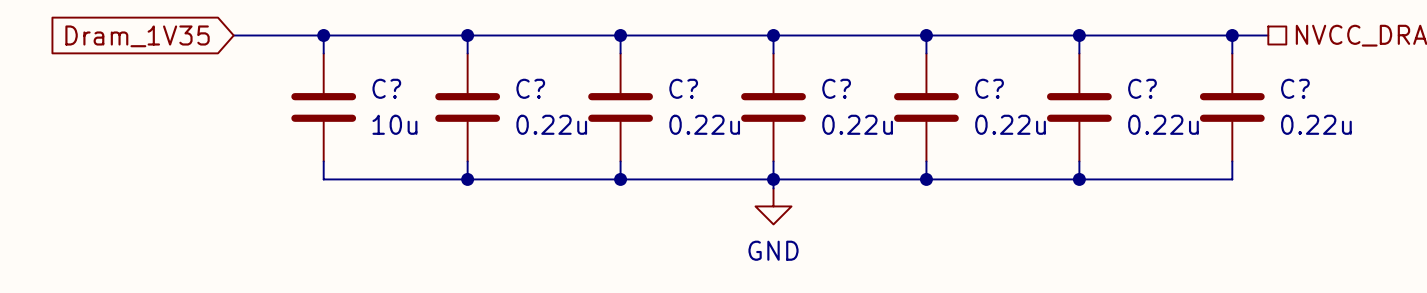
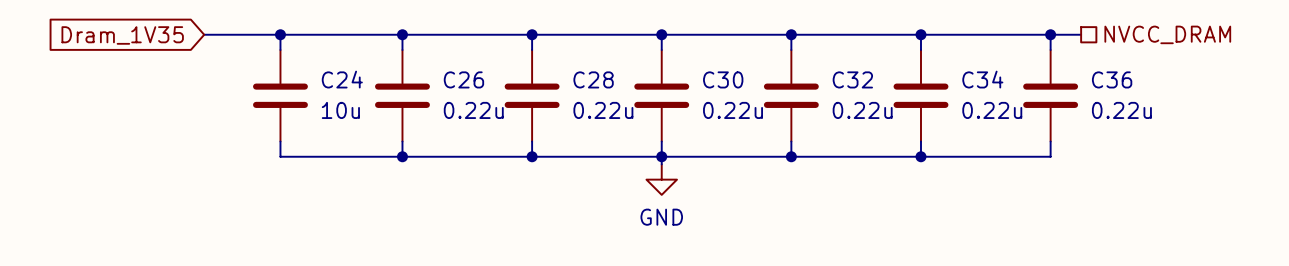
C? name: C? (386, 88) -> C24 (342, 79)
C? name: C? (530, 88) -> C26 (463, 79)
C? name: C? (683, 88) -> C28 (593, 79)
C? name: C? (836, 88) -> C30 (723, 79)
C? name: C? (989, 88) -> C32 (852, 79)
C? name: C? (1142, 88) -> C34 (982, 79)
C? name: C? (1295, 88) -> C36 (1112, 79)

